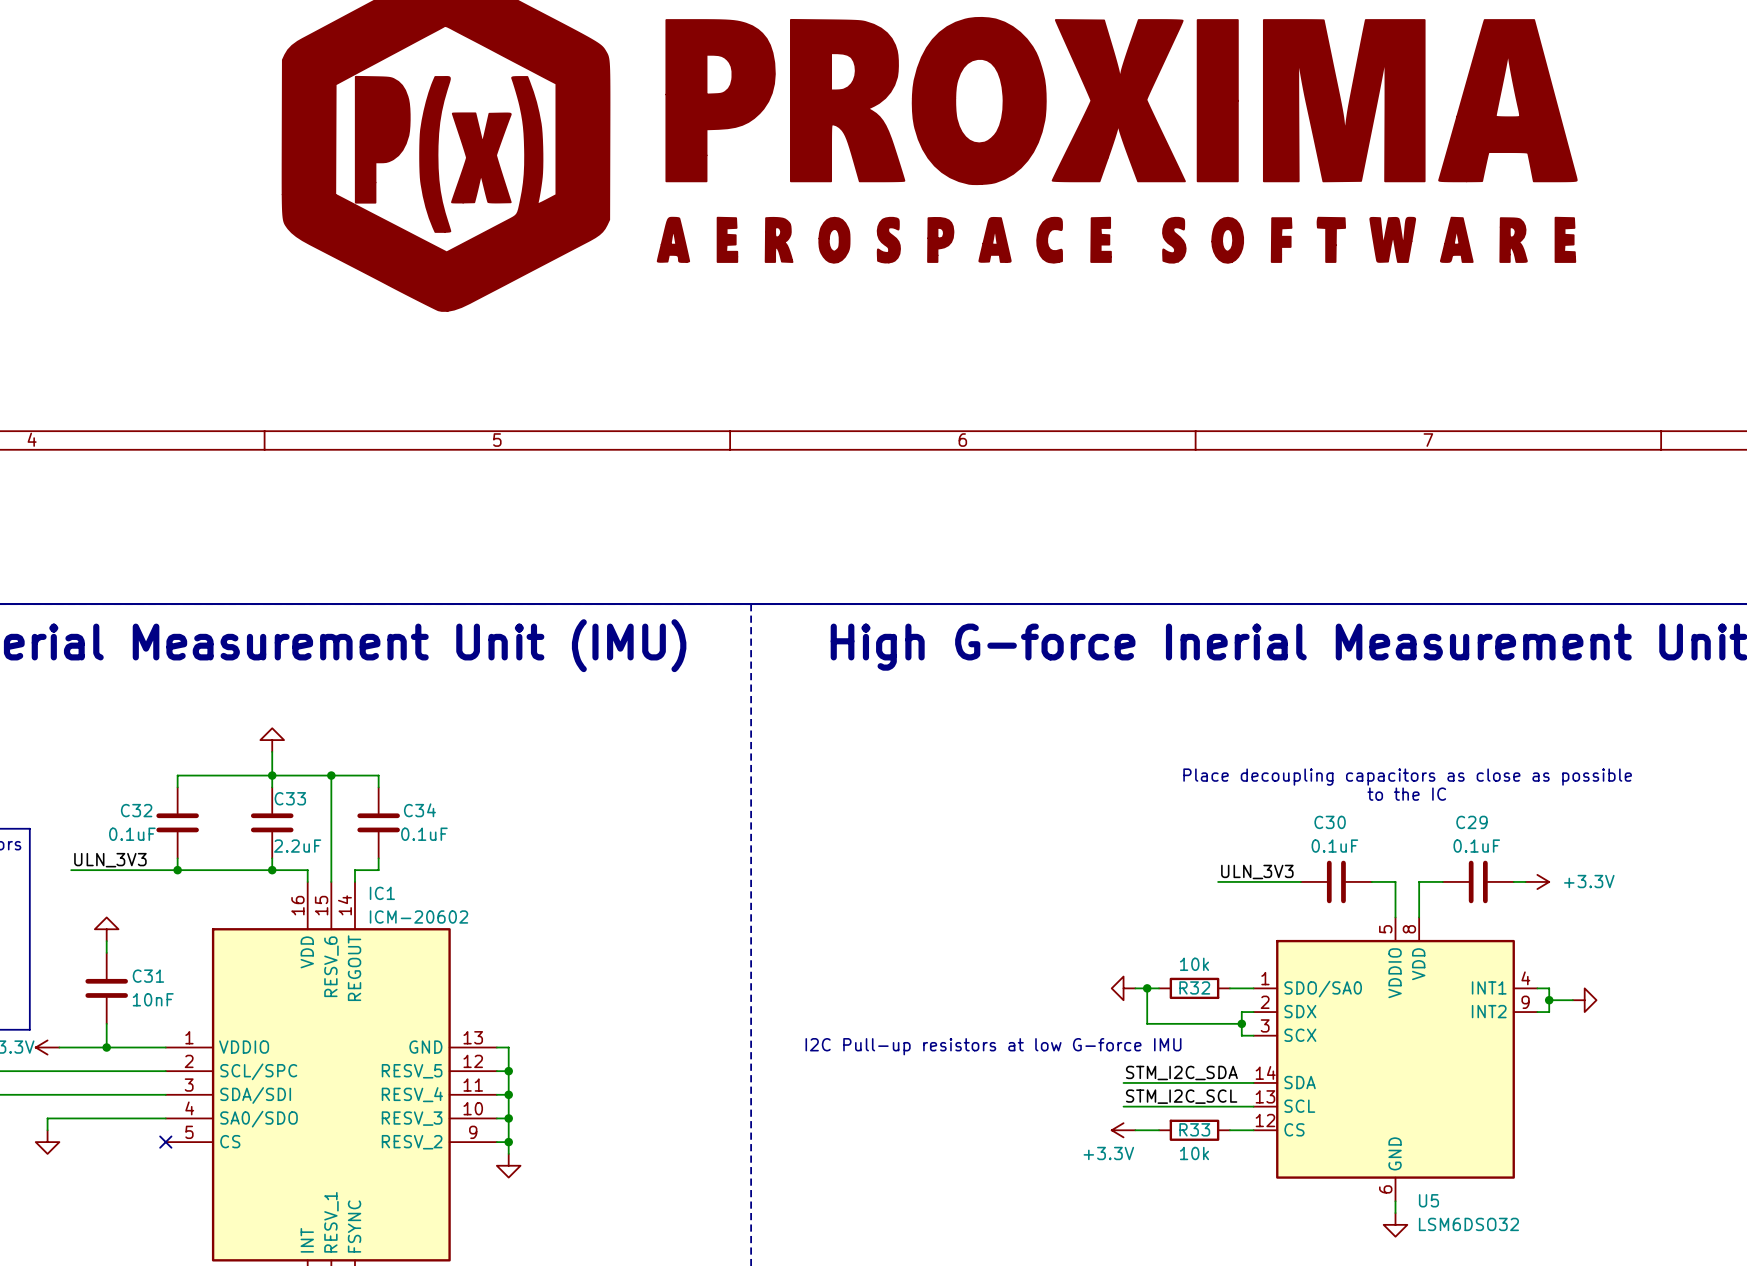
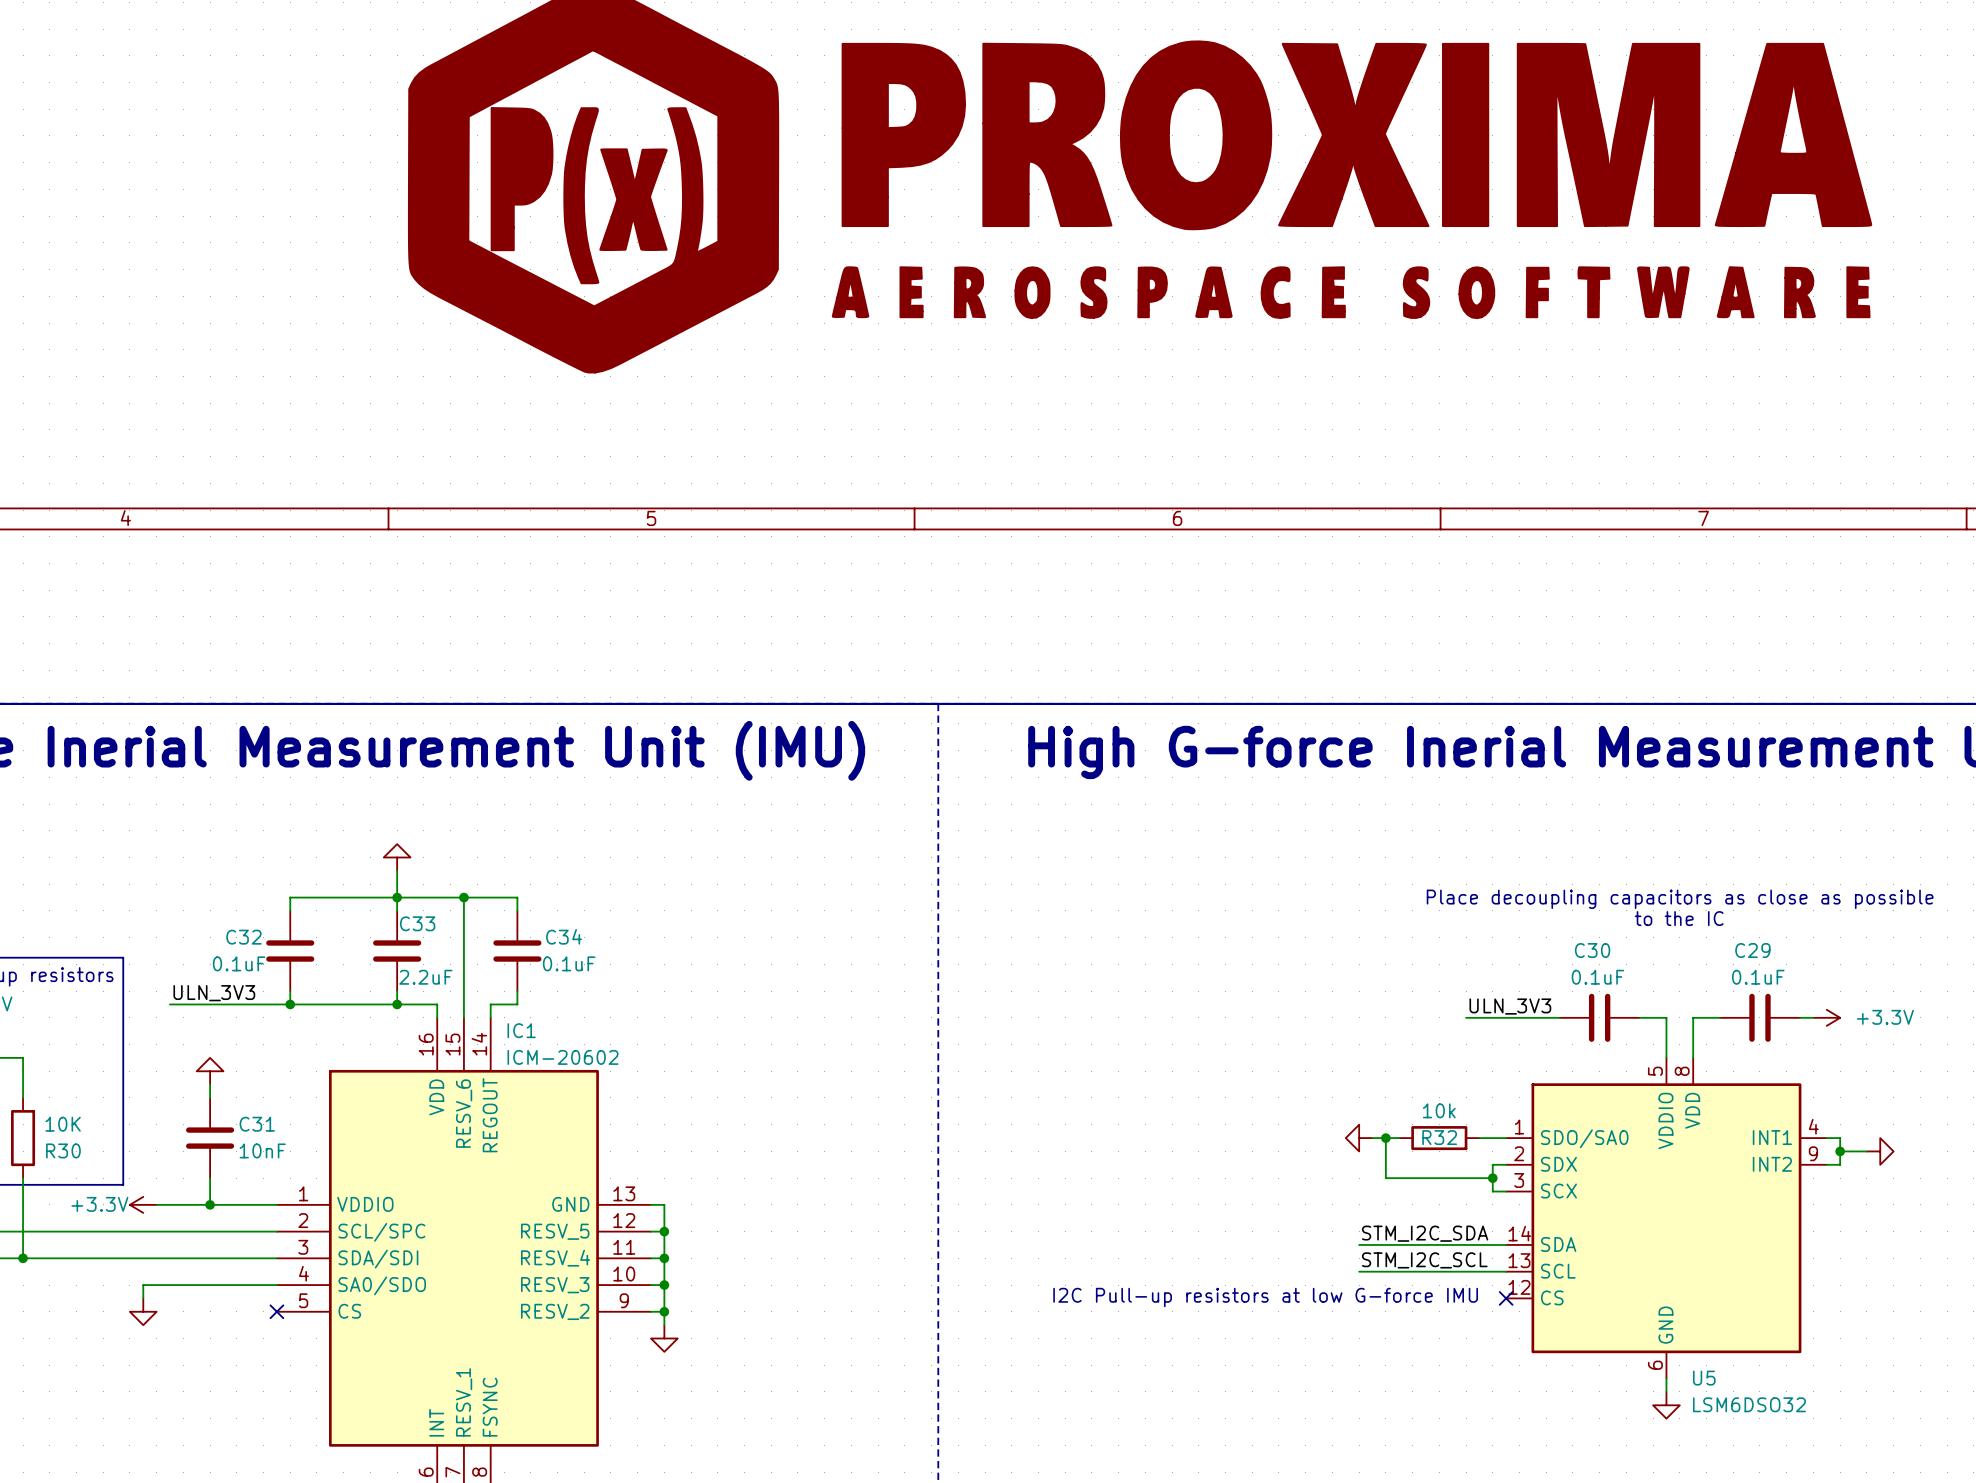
text position: I2C Pull-up resistors at low G-force IMU (993, 1046) -> I2C Pull-up resistors at low G-force IMU (1265, 1297)
power symbol: +3.3V (1123, 1130) -> none
wire: (1135, 1130) (1159, 1130) -> none
R33: 10k (1194, 1130) -> none
wire: (1229, 1130) (1253, 1130) -> none
no-connect mark: none -> (1506, 1298)

